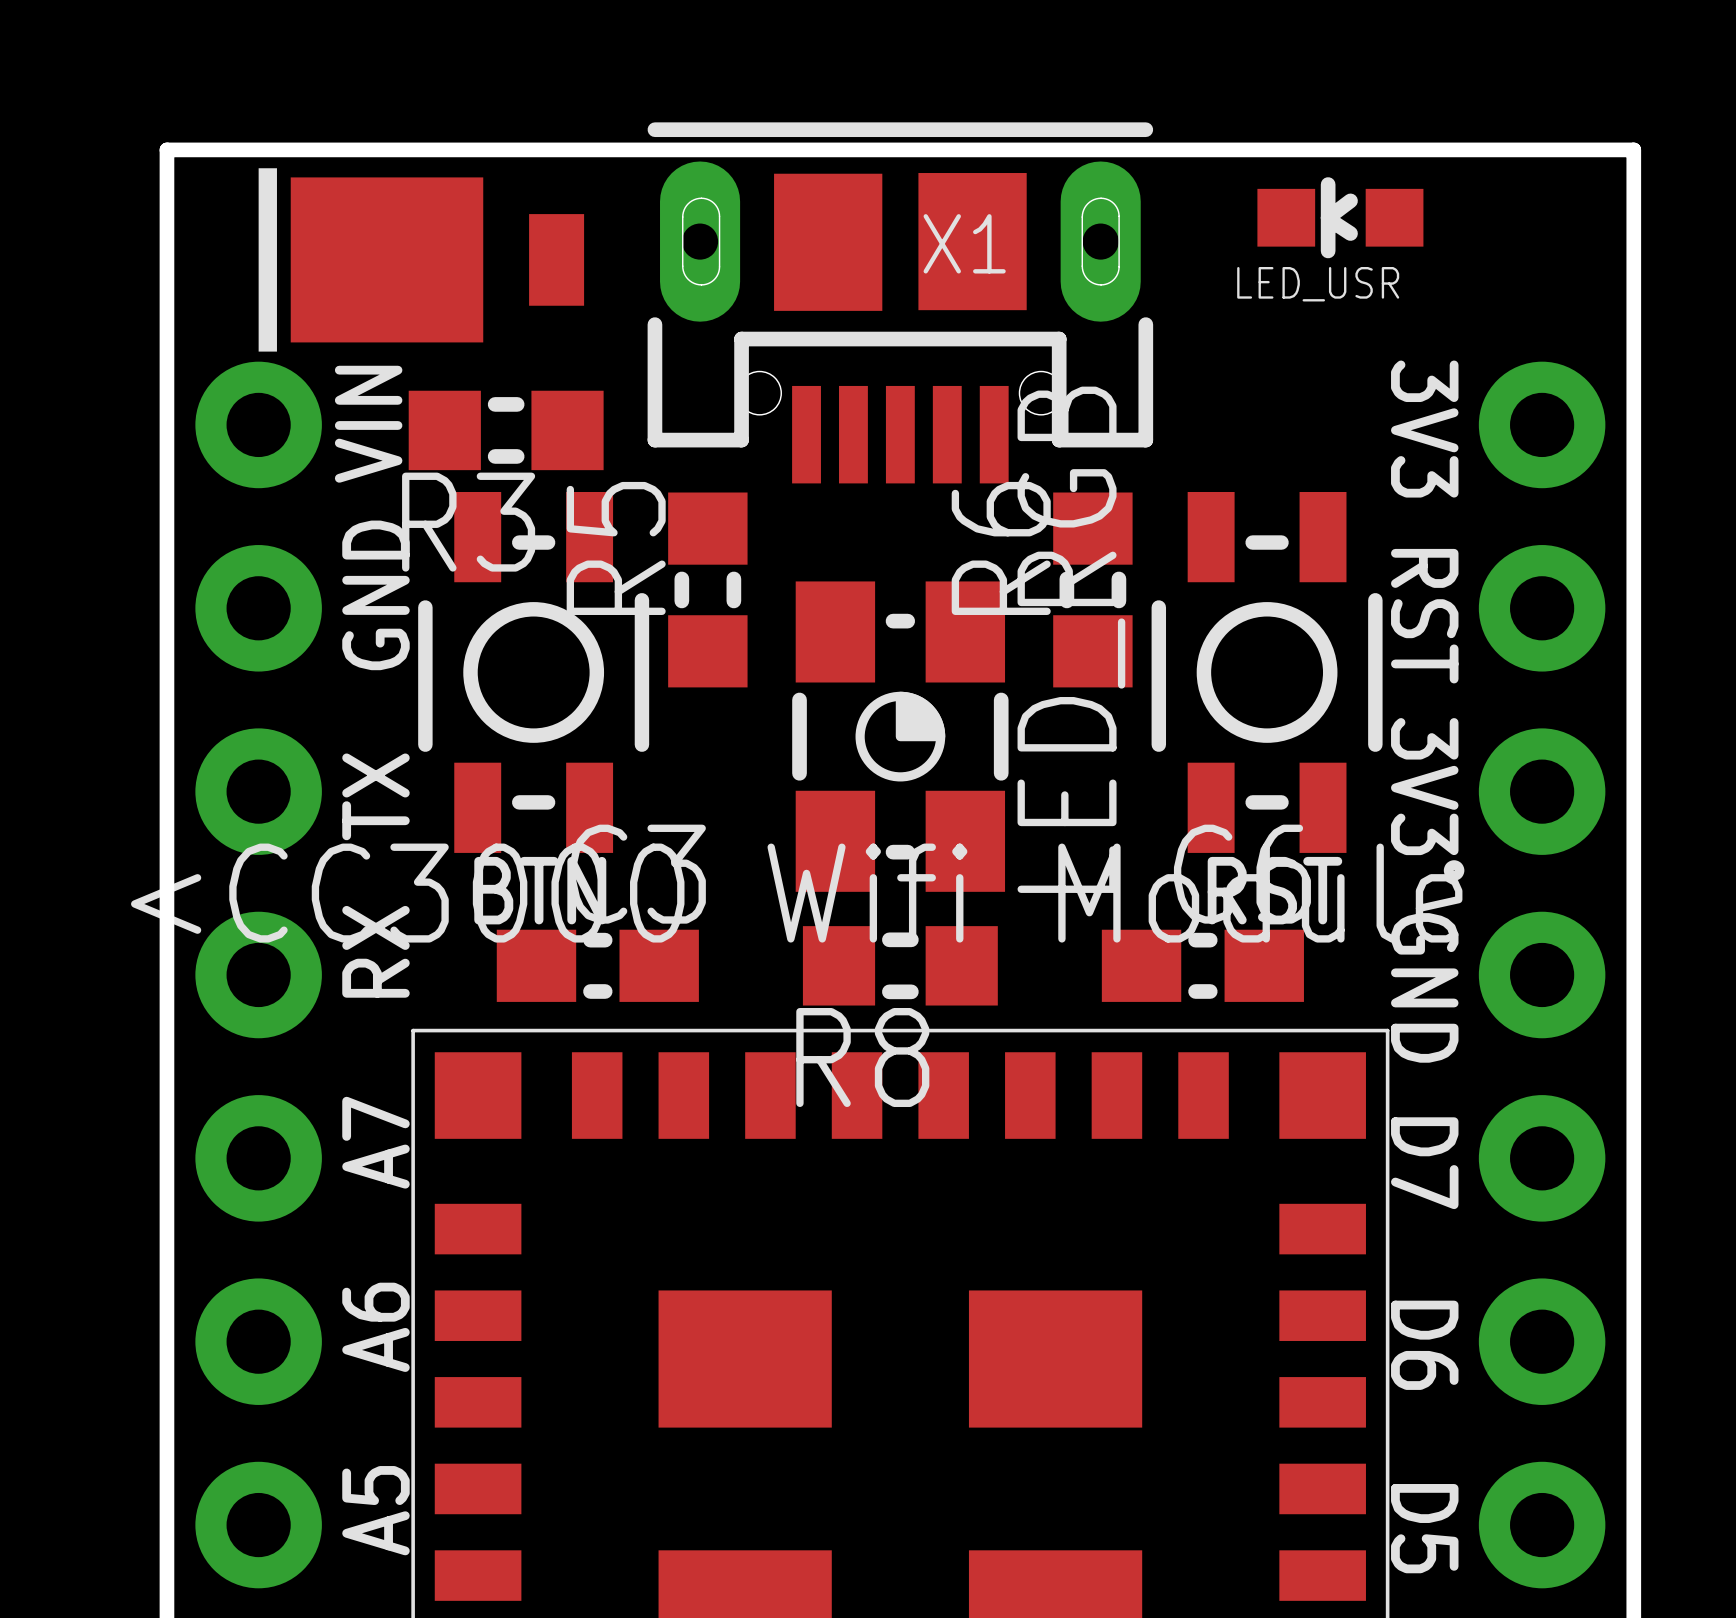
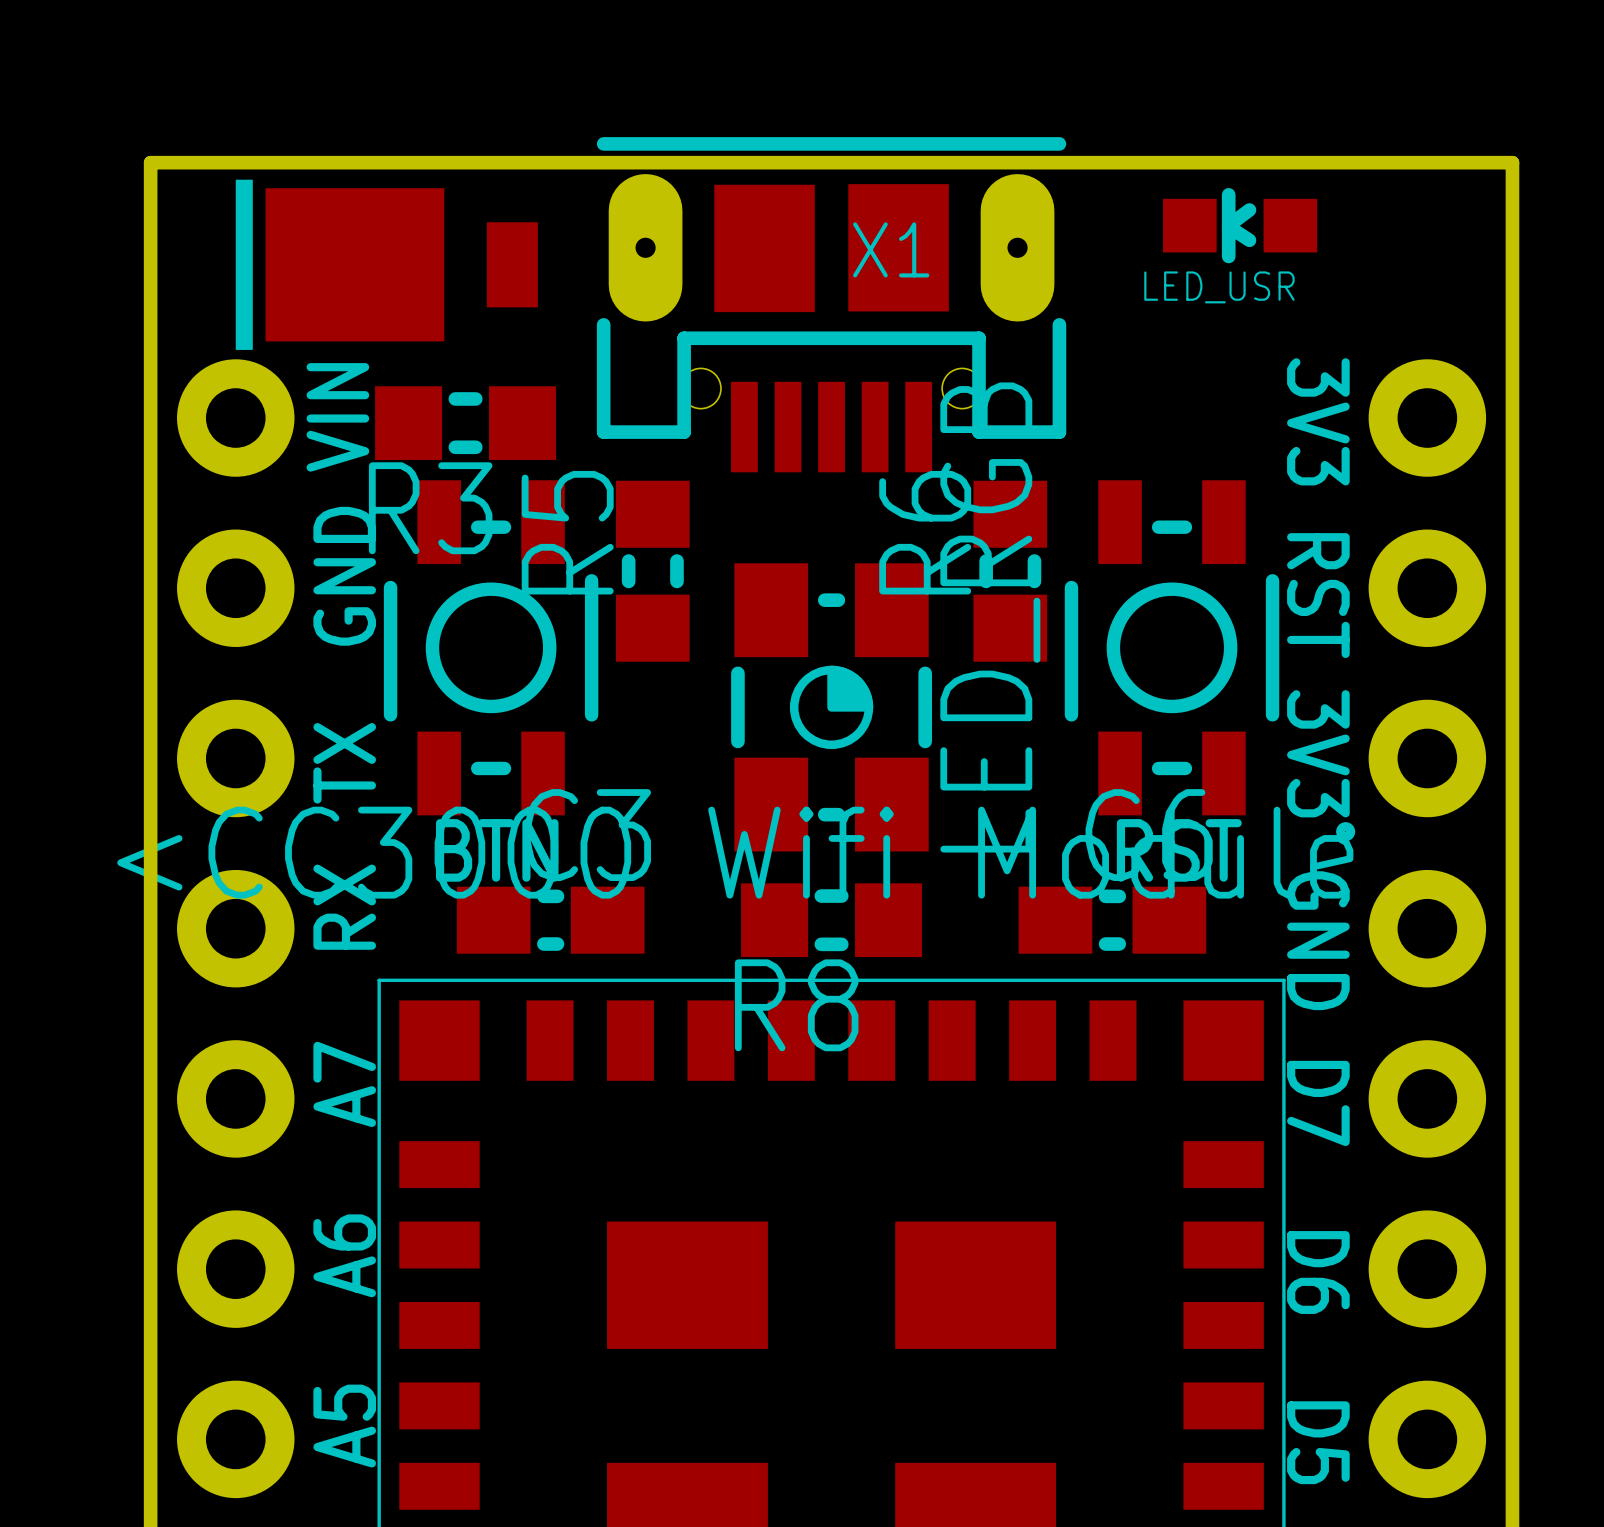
X1 footprint: [647, 122, 1154, 484] -> [596, 137, 1067, 473]

